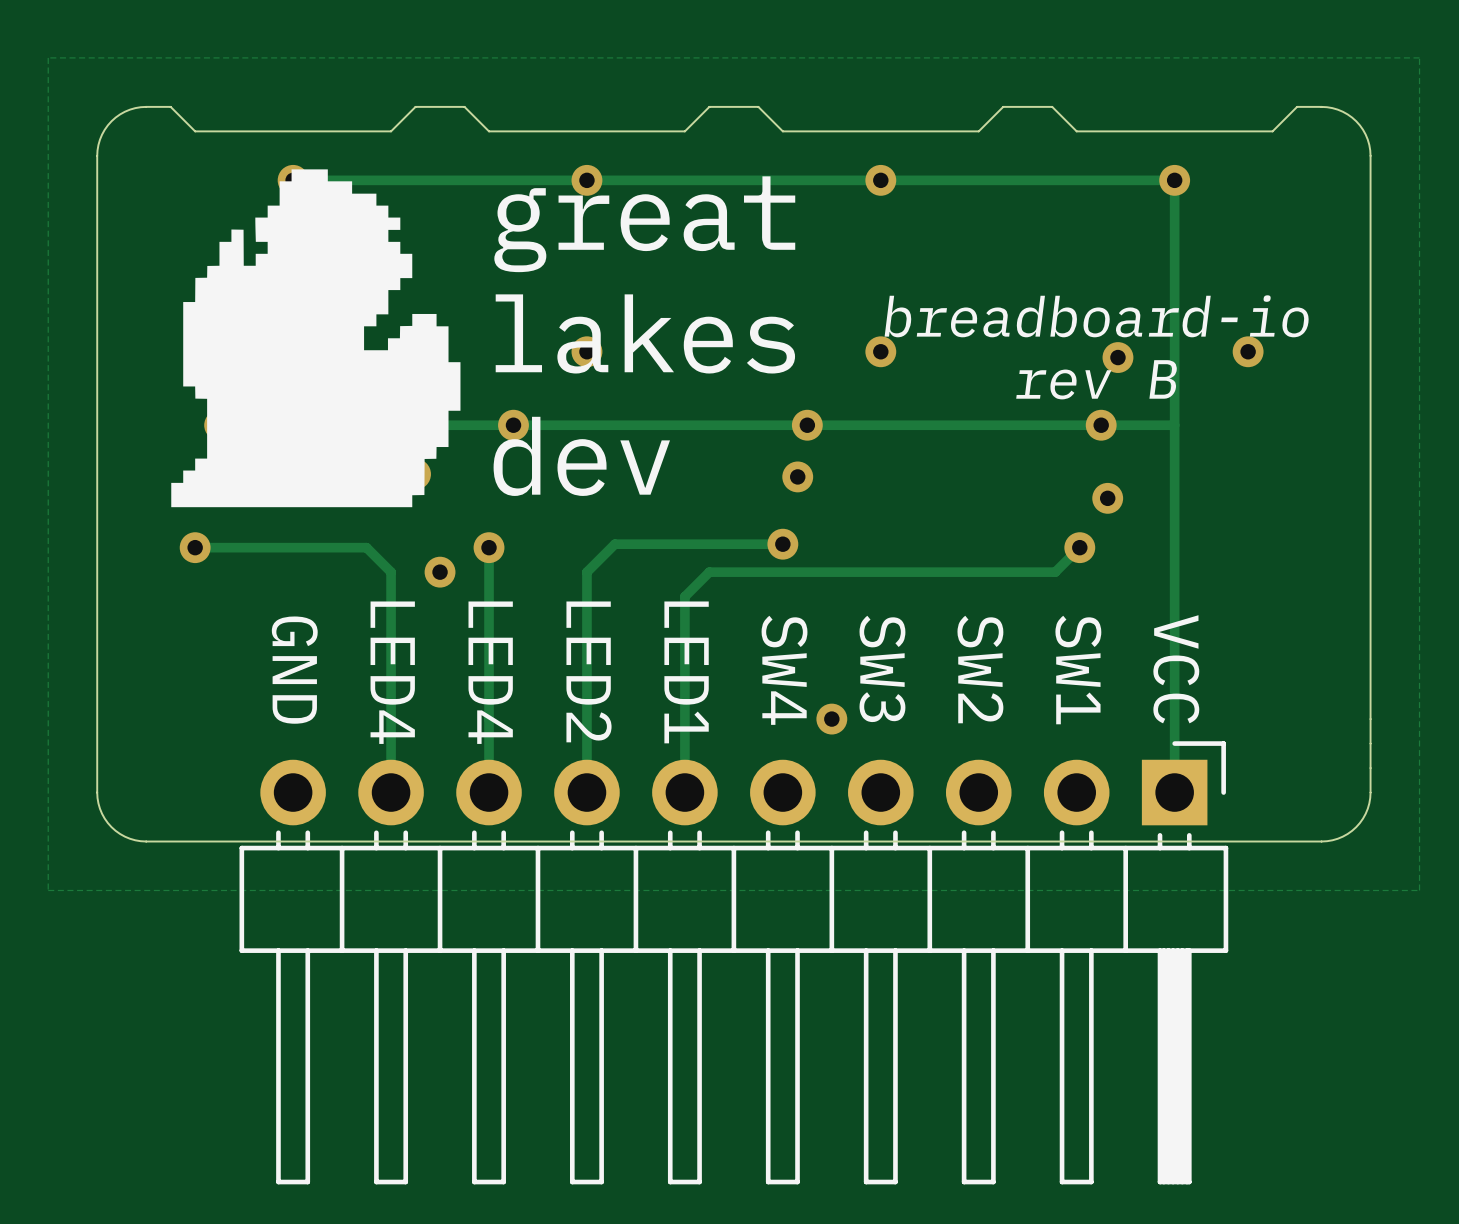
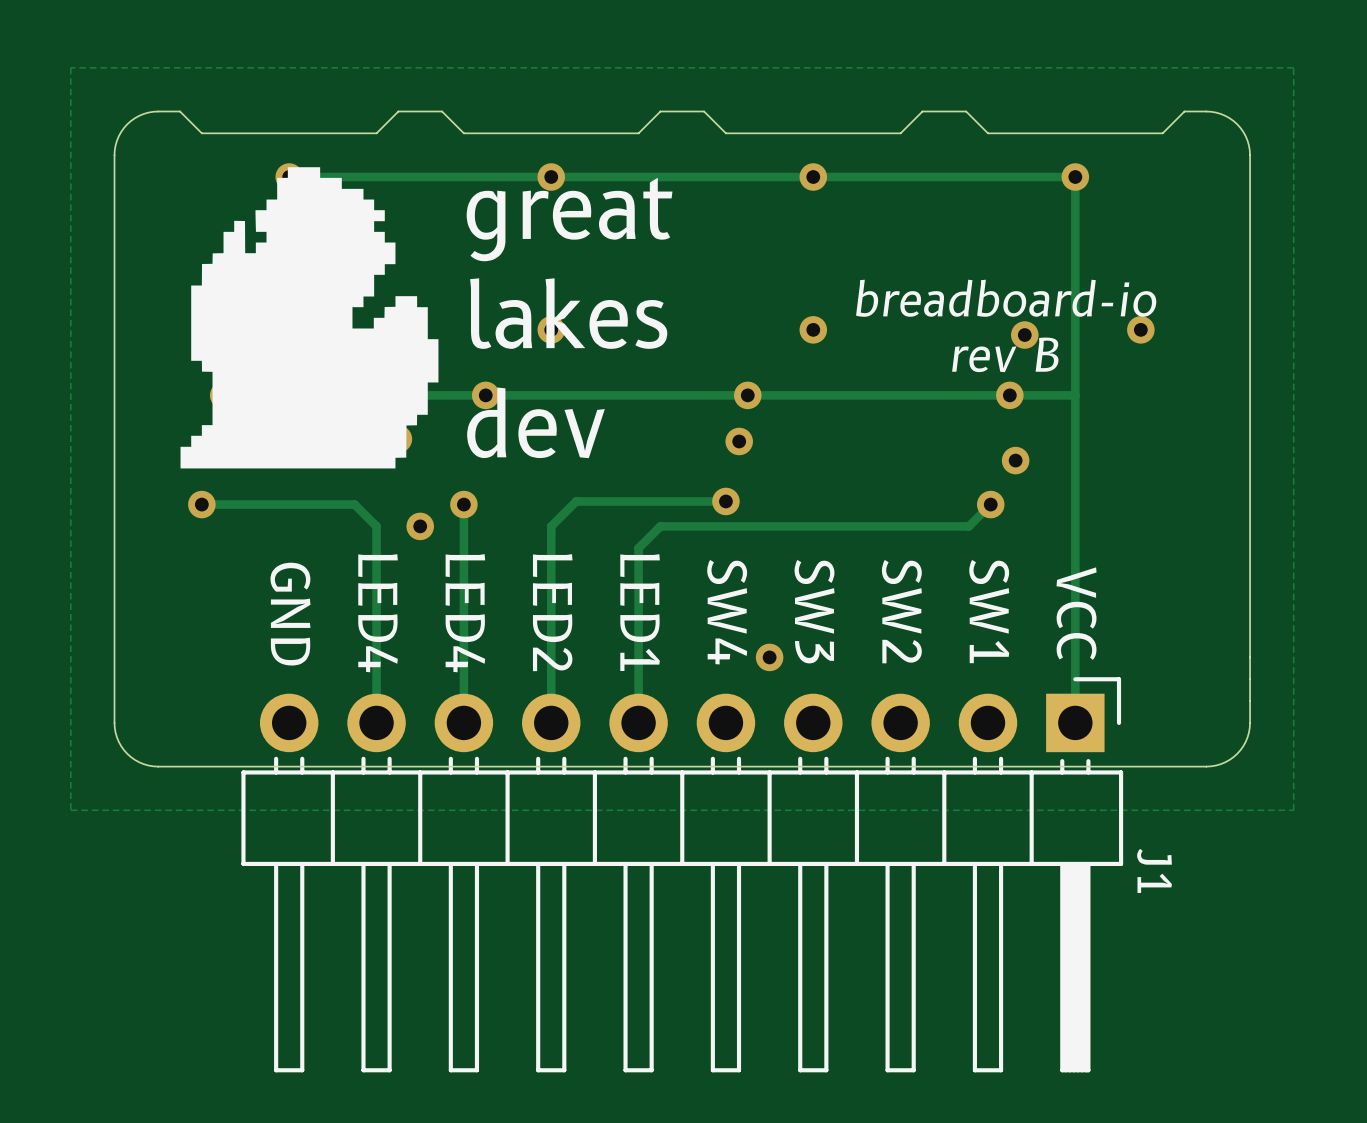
J1 name: none -> J1 (1154, 870)

